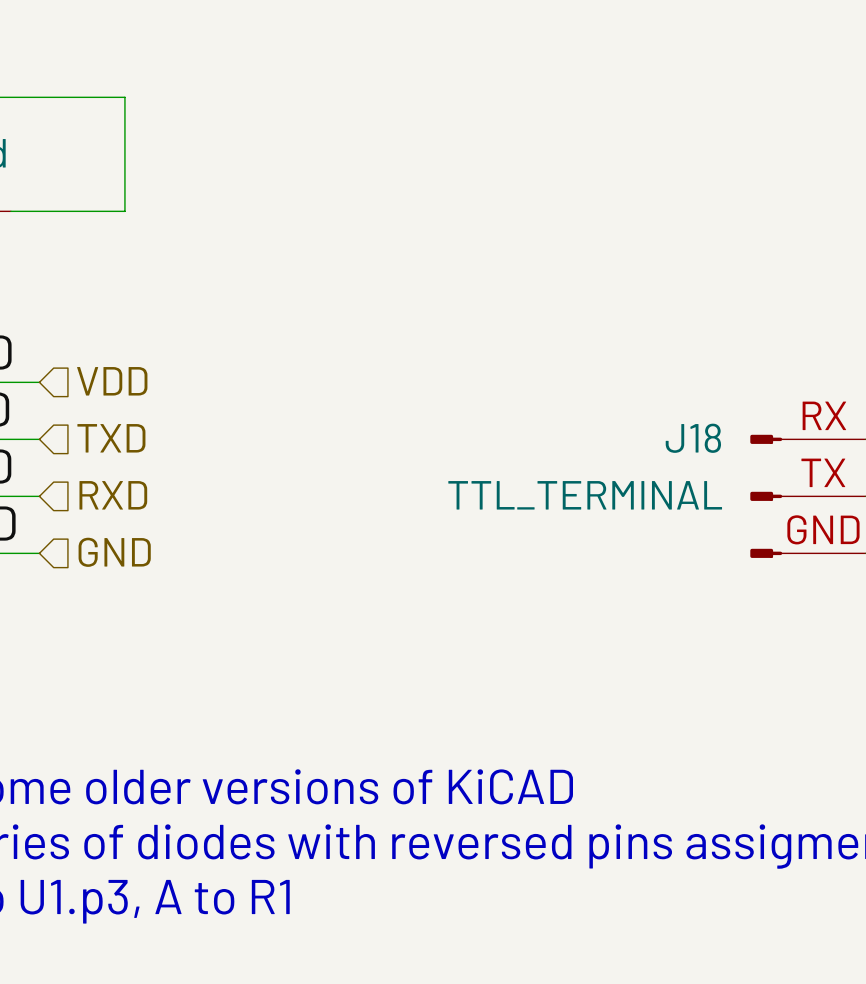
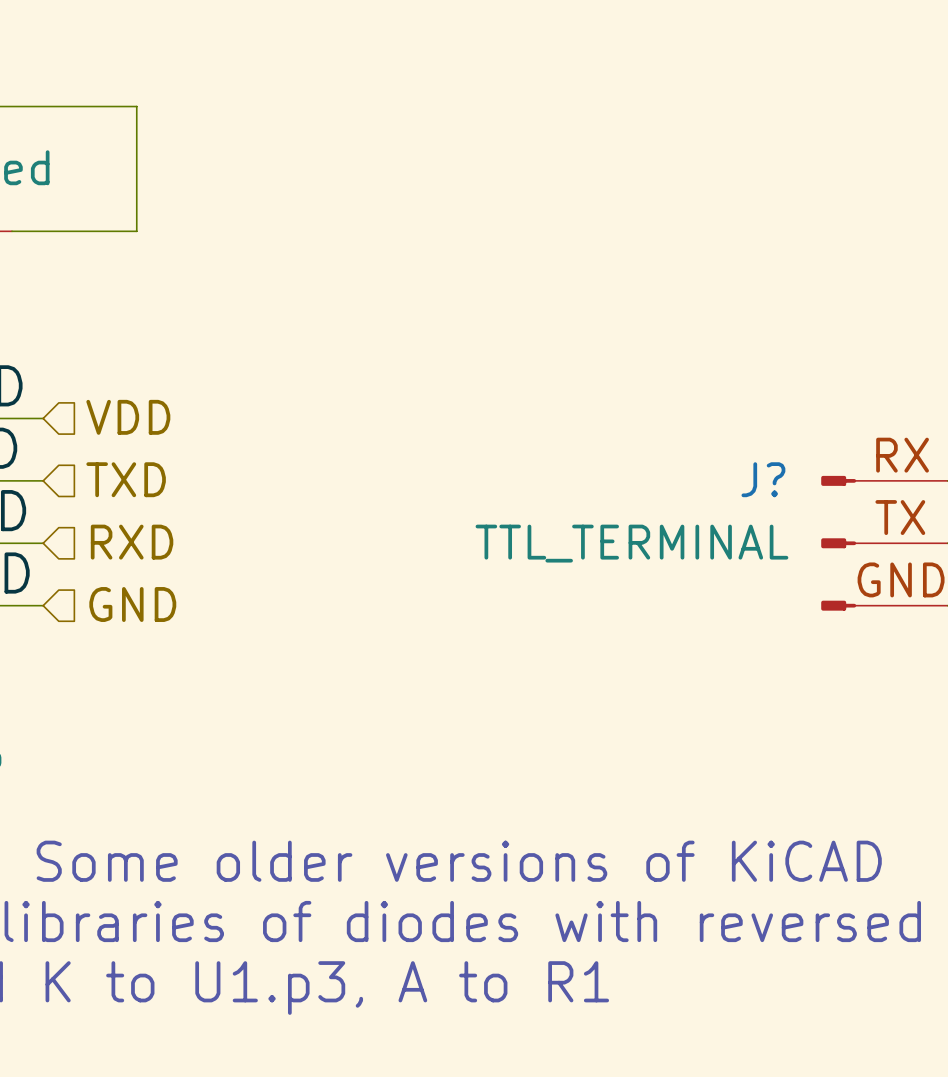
J18 name: J18 (693, 438) -> J? (763, 479)

